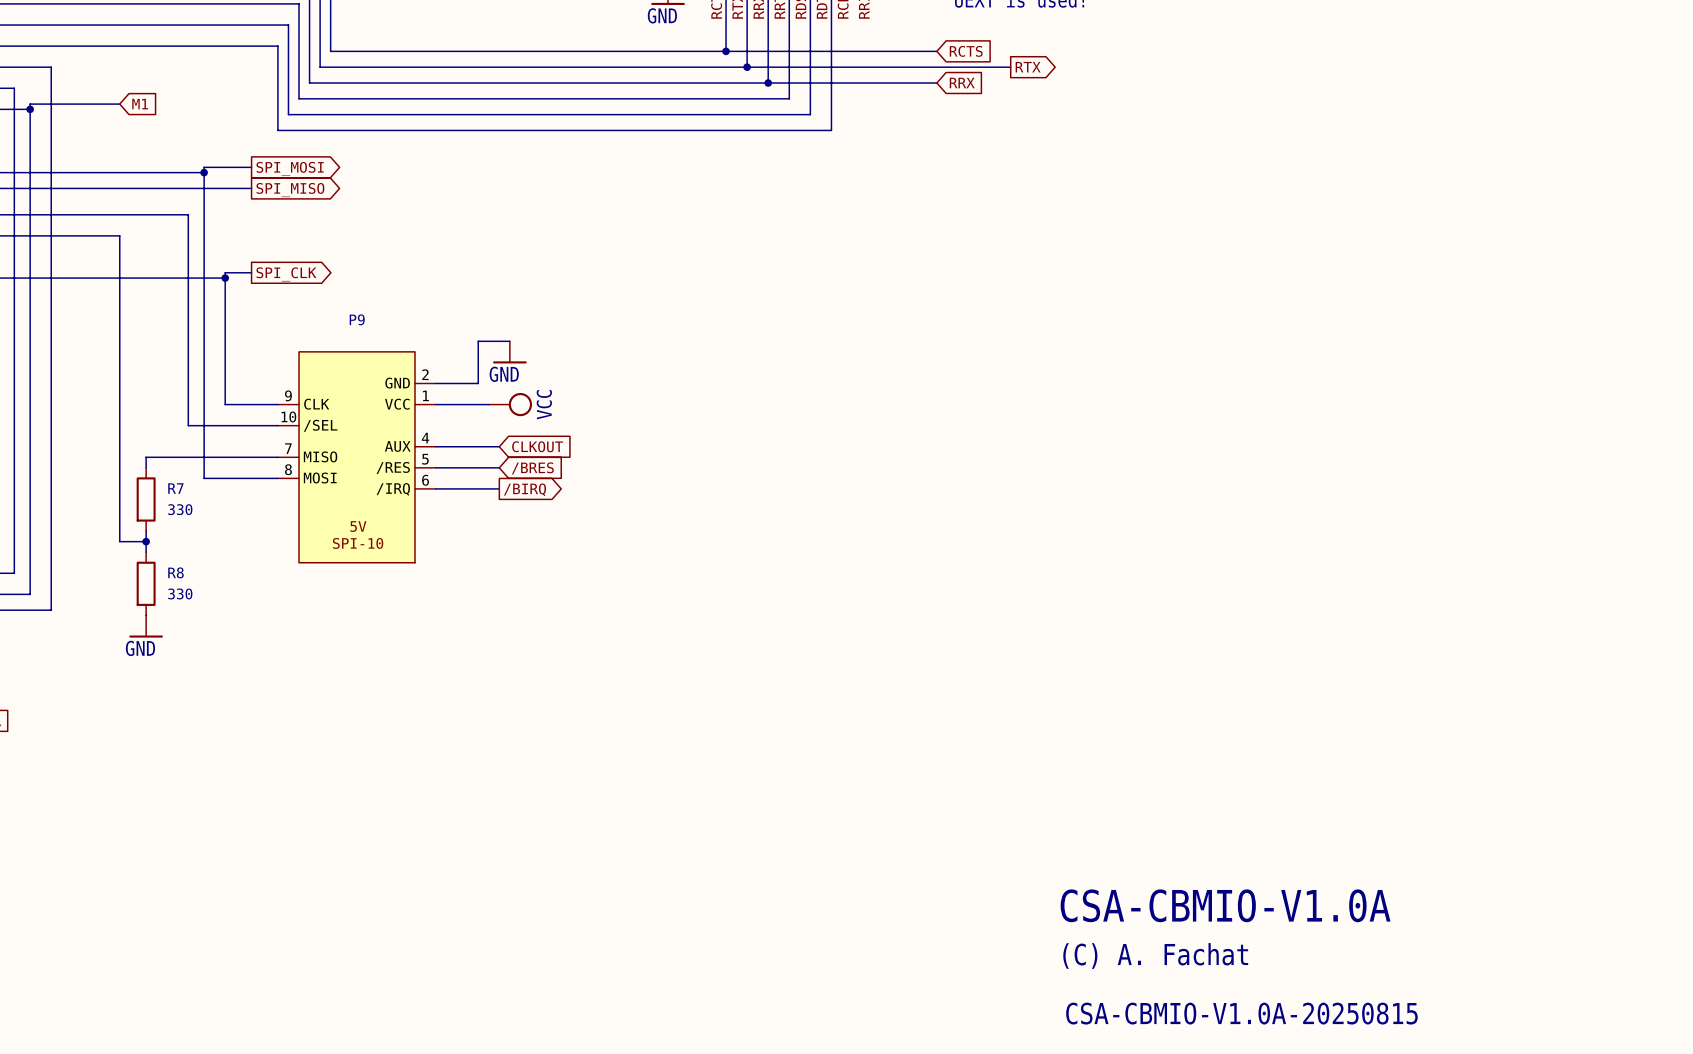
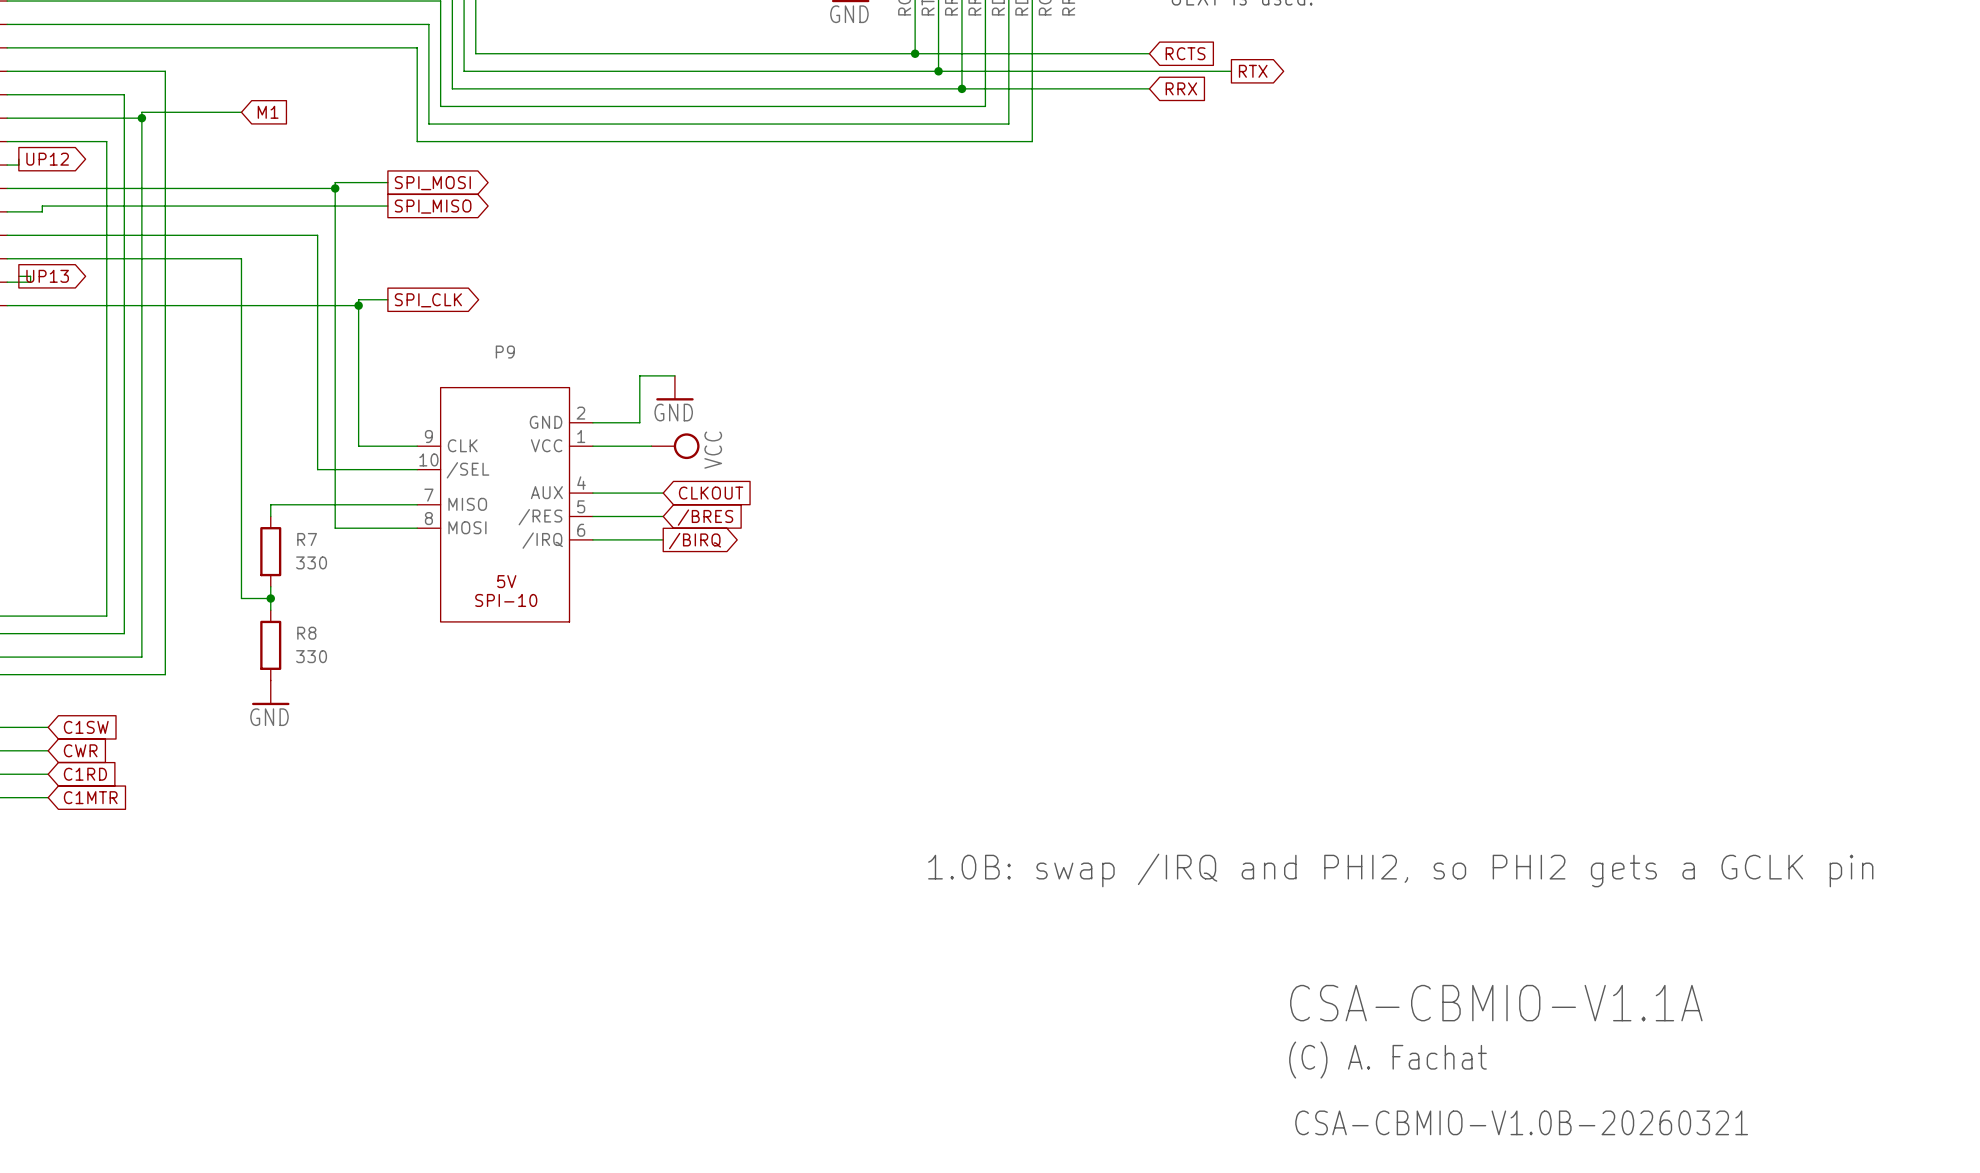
text: none -> 1.0B: swap /IRQ and PHI2, so PHI2 gets a GCLK pin (1400, 870)
text: CSA-CBMIO-V1.0A (1225, 905) -> CSA-CBMIO-V1.1A (1496, 1003)
text: CSA-CBMIO-V1.0A-20250815 (1241, 1013) -> CSA-CBMIO-V1.0B-20260321 (1521, 1122)

